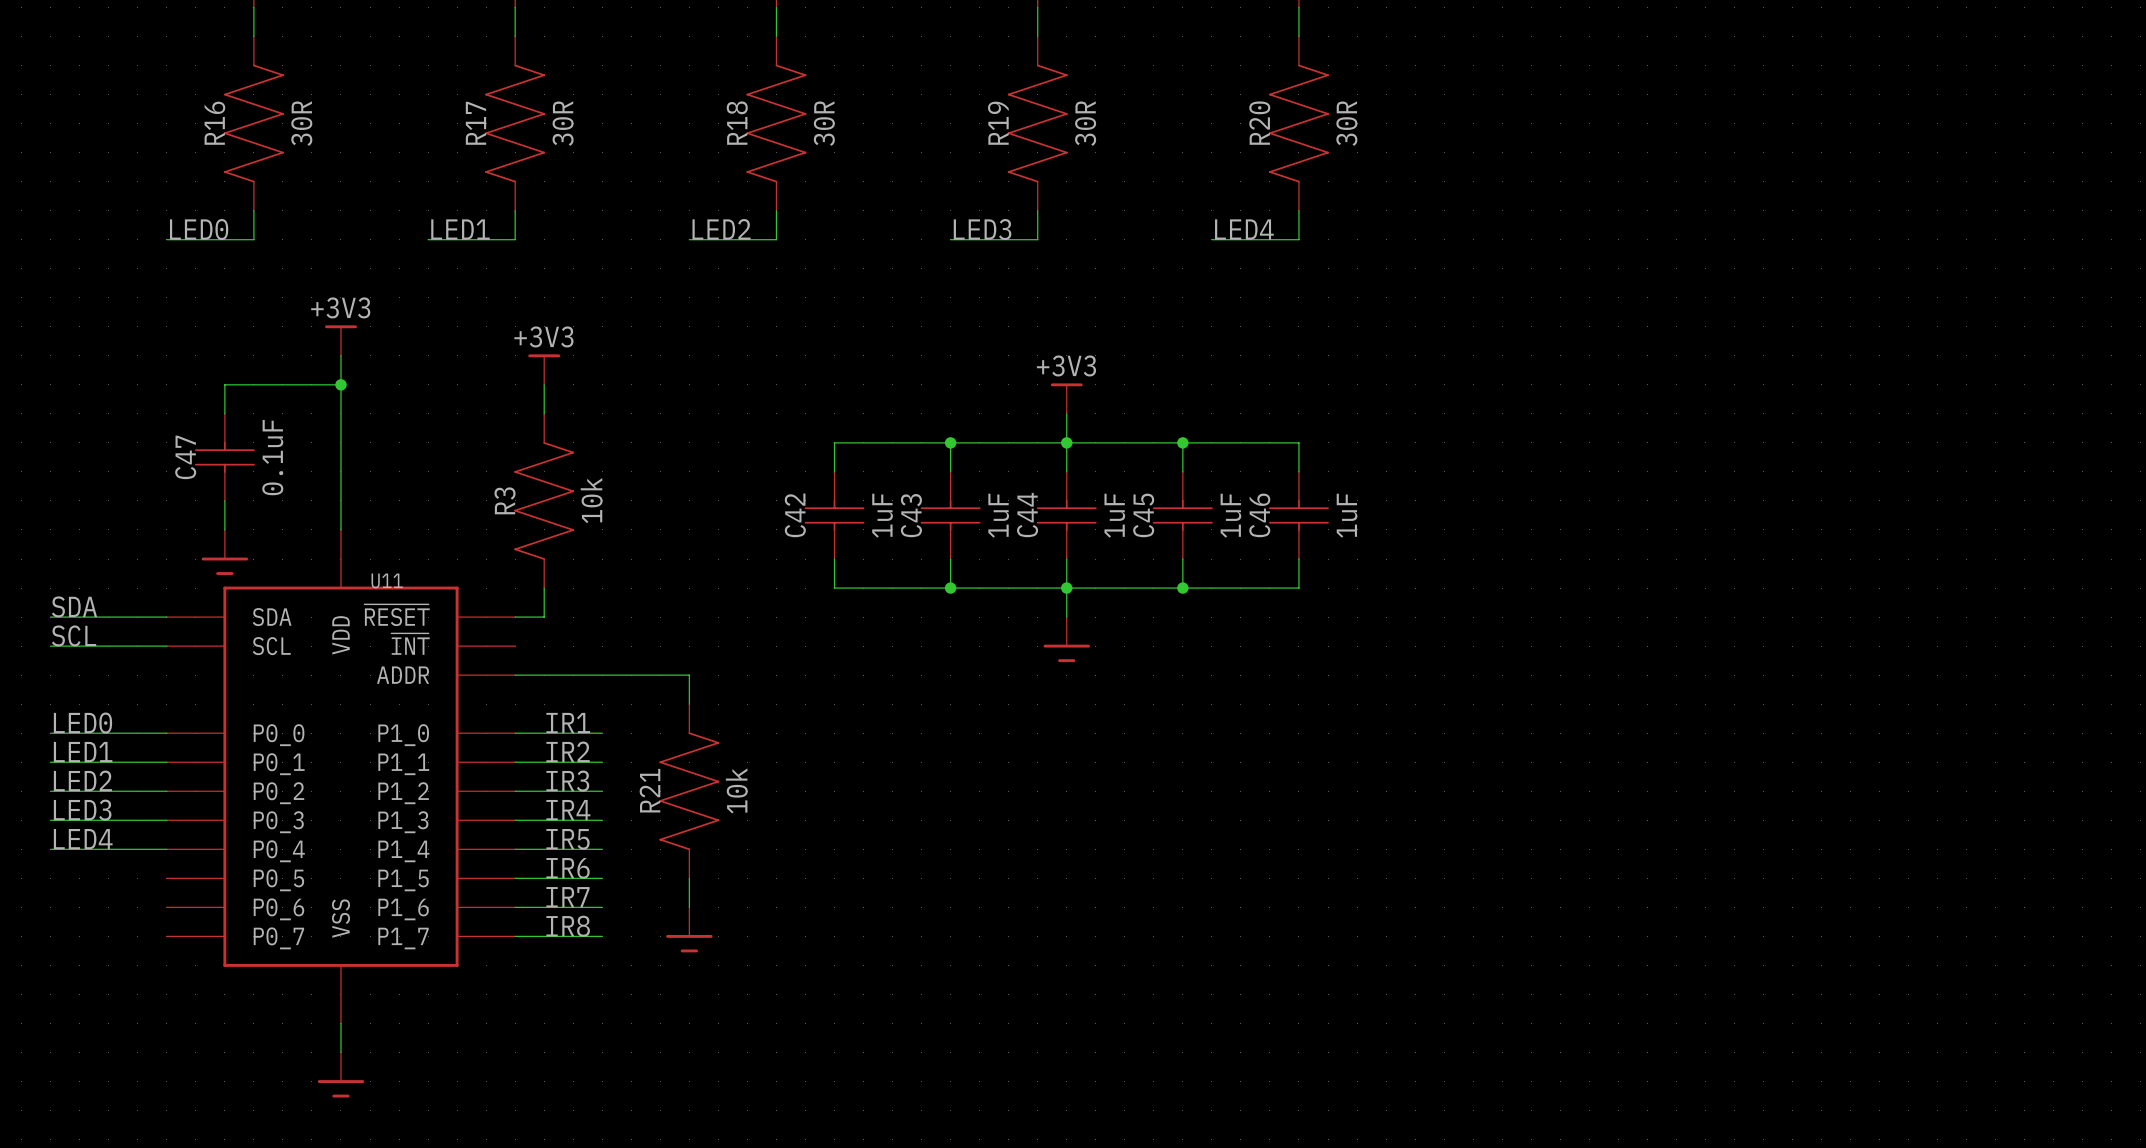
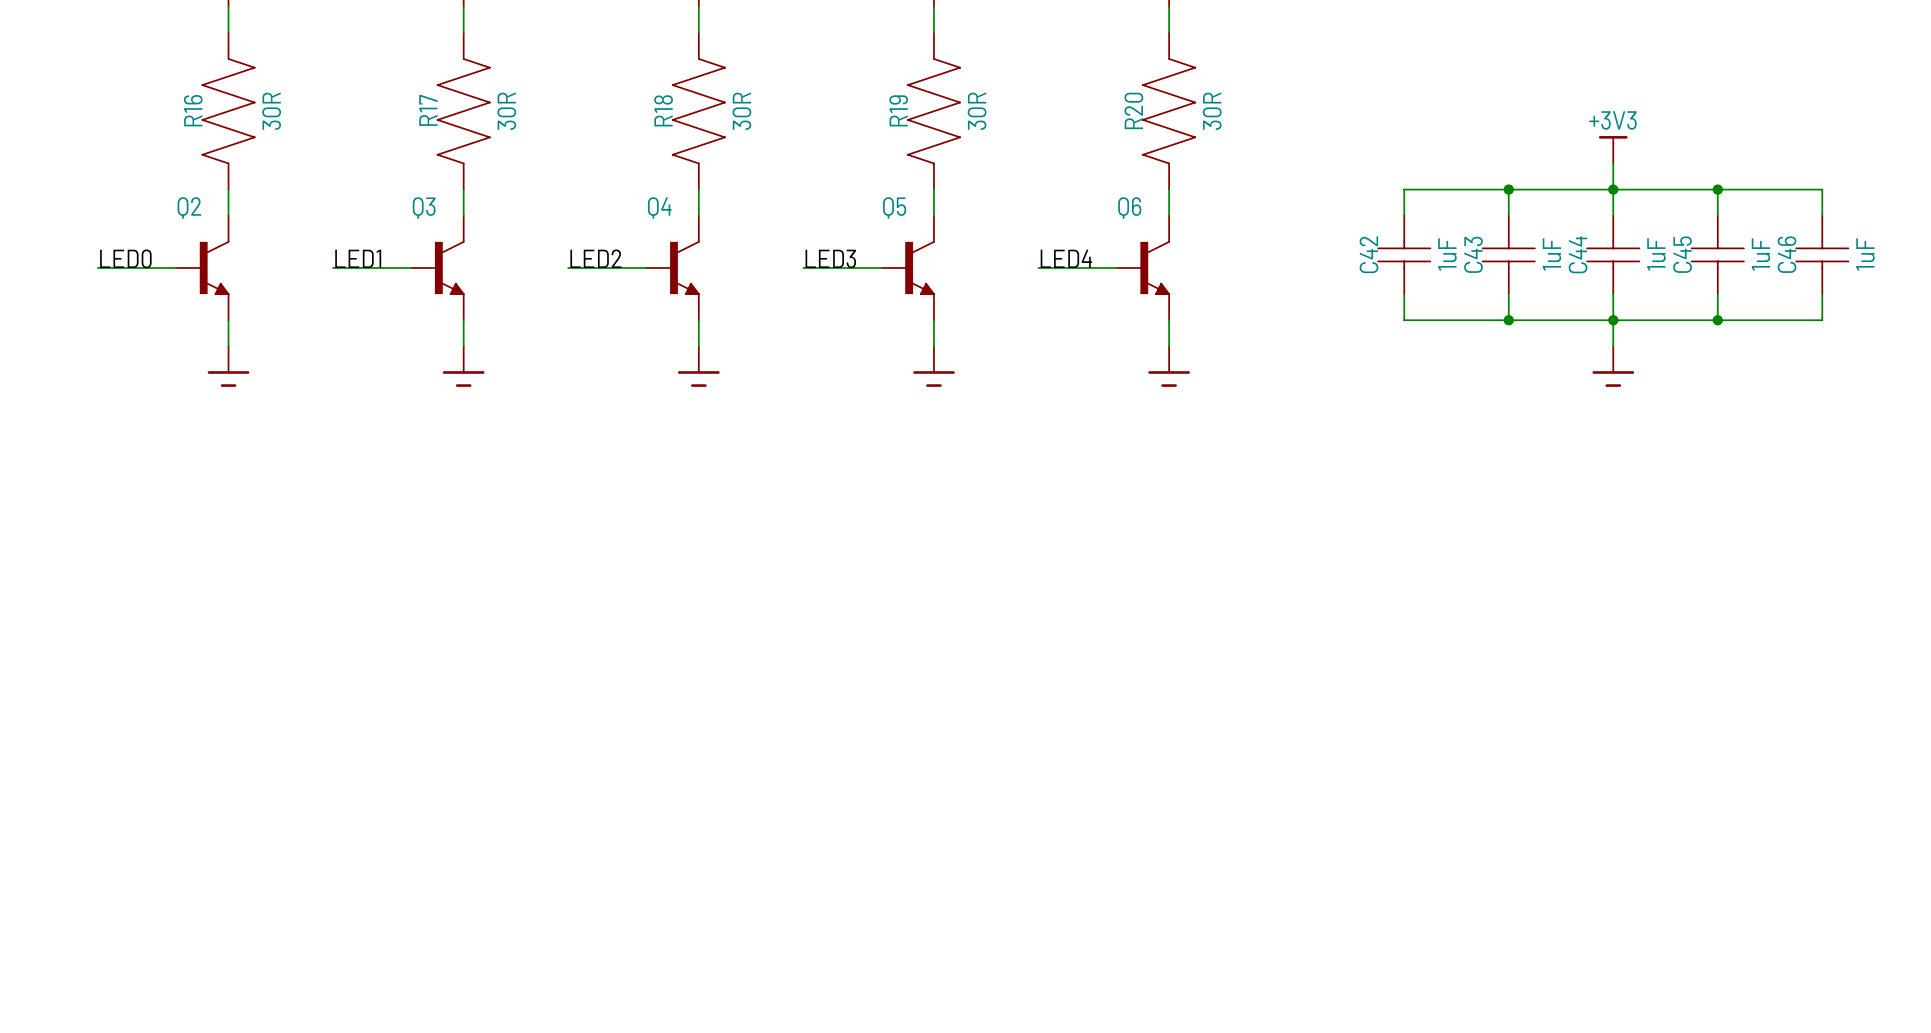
power symbol: none -> +3V3 (1613, 149)
wire: none -> (1613, 163) (1613, 215)
wire: none -> (1508, 189) (1508, 215)
junction: none -> (1508, 189)
junction: none -> (1613, 189)
wire: none -> (1717, 189) (1717, 215)
junction: none -> (1717, 189)
label position: LED0 (199, 229) -> LED0 (125, 258)
label position: LED1 (460, 229) -> LED1 (358, 258)
label position: LED2 (721, 229) -> LED2 (595, 258)
label position: LED3 (982, 229) -> LED3 (830, 258)
label position: LED4 (1244, 229) -> LED4 (1066, 258)
wire: (166, 239) (253, 239) -> (97, 267) (176, 267)
wire: (428, 239) (515, 239) -> (333, 267) (411, 267)
wire: (689, 239) (776, 239) -> (568, 267) (646, 267)
wire: (950, 239) (1037, 239) -> (803, 267) (881, 267)
wire: (1211, 239) (1298, 239) -> (1038, 267) (1116, 267)
wire: none -> (1404, 215) (1404, 189) (1822, 189) (1822, 215)
Q2: none -> (202, 267)
Q3: none -> (437, 267)
Q4: none -> (673, 267)
Q5: none -> (908, 267)
Q6: none -> (1143, 267)
wire: none -> (1404, 294) (1404, 320) (1822, 320) (1822, 294)
wire: none -> (1508, 294) (1508, 320)
wire: none -> (1613, 294) (1613, 346)
wire: none -> (1717, 294) (1717, 320)
power symbol: +3V3 (340, 340) -> none
wire: (340, 355) (340, 529) -> none
junction: none -> (1508, 320)
junction: none -> (1613, 320)
junction: none -> (1717, 320)
power symbol: +3V3 (544, 369) -> none
wire: (340, 384) (224, 384) (224, 413) -> none
junction: (340, 384) -> none
wire: (544, 384) (544, 413) -> (463, 320) (463, 346)
power symbol: +3V3 (1066, 398) -> none
power symbol: none -> (463, 366)
power symbol: none -> (698, 366)
power symbol: none -> (933, 366)
power symbol: none -> (1169, 366)
power symbol: none -> (1613, 366)
wire: (1066, 413) (1066, 471) -> none
wire: (950, 442) (950, 471) -> (933, 320) (933, 346)
junction: (950, 442) -> none
junction: (1066, 442) -> none
wire: (1182, 442) (1182, 471) -> (1169, 320) (1169, 346)
junction: (1182, 442) -> none
C47: 0.1uF (224, 457) -> none
wire: (834, 471) (834, 442) (1298, 442) (1298, 471) -> none
wire: (224, 500) (224, 529) -> (228, 320) (228, 346)
R3: 10k (544, 500) -> none
C42 position: (834, 515) -> (1404, 254)
C43 position: (950, 515) -> (1508, 254)
C44 position: (1066, 515) -> (1613, 254)
C45 position: (1182, 515) -> (1717, 254)
C46 position: (1298, 515) -> (1822, 254)
power symbol position: (224, 552) -> (228, 366)
wire: (834, 559) (834, 588) (1298, 588) (1298, 559) -> none
wire: (950, 559) (950, 588) -> (698, 320) (698, 346)
wire: (1066, 559) (1066, 617) -> none
wire: (1182, 559) (1182, 588) -> none
wire: (544, 588) (544, 617) (515, 617) -> none
junction: (950, 588) -> none
junction: (1066, 588) -> none
junction: (1182, 588) -> none
label: SDA (74, 606) -> none
wire: (50, 617) (166, 617) -> none
label: SCL (74, 635) -> none
power symbol: (1066, 639) -> none
wire: (50, 646) (166, 646) -> none
wire: (515, 675) (689, 675) (689, 704) -> none
label: LED0 (82, 723) -> none
label: IR1 (568, 723) -> none
wire: (50, 733) (166, 733) -> none
wire: (515, 733) (602, 733) -> none
label: IR2 (568, 751) -> none
label: LED1 (83, 752) -> none
wire: (50, 762) (166, 762) -> none
wire: (515, 762) (602, 762) -> none
U11: (340, 776) -> none
label: LED2 (82, 780) -> none
label: IR3 (567, 781) -> none
wire: (50, 791) (166, 791) -> none
wire: (515, 791) (602, 791) -> none
R21: 10k (689, 791) -> none
label: LED3 (82, 810) -> none
label: IR4 (568, 810) -> none
wire: (50, 820) (166, 820) -> none
wire: (515, 820) (602, 820) -> none
label: LED4 (83, 839) -> none
label: IR5 (568, 839) -> none
wire: (50, 849) (166, 849) -> none
wire: (515, 849) (602, 849) -> none
label: IR6 (568, 868) -> none
wire: (515, 878) (602, 878) -> none
wire: (689, 878) (689, 907) -> none
label: IR7 (567, 897) -> none
wire: (515, 907) (602, 907) -> none
label: IR8 (568, 926) -> none
power symbol: (689, 929) -> none
wire: (515, 936) (602, 936) -> none
wire: (340, 1023) (340, 1052) -> none
power symbol: (340, 1075) -> none

